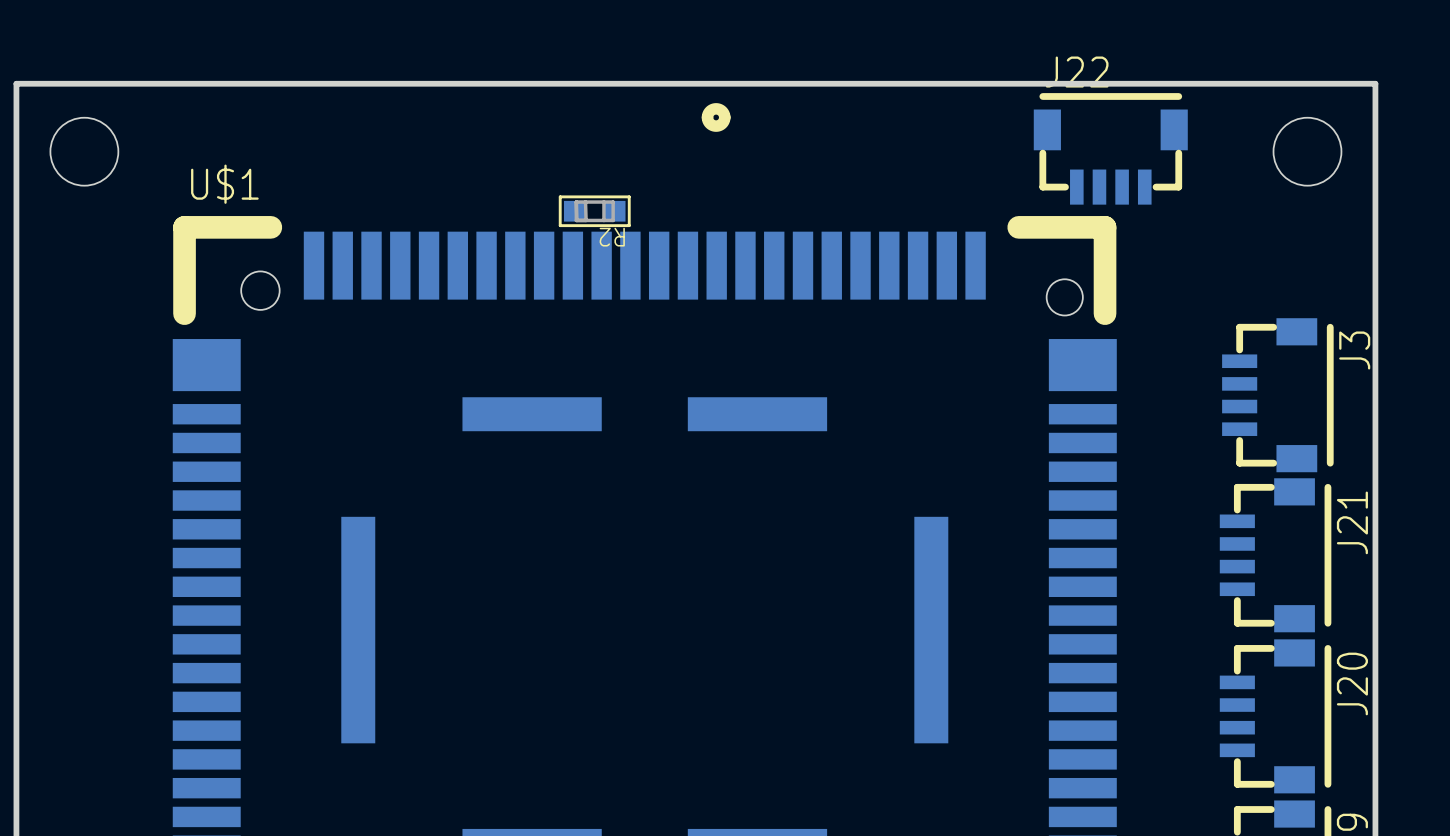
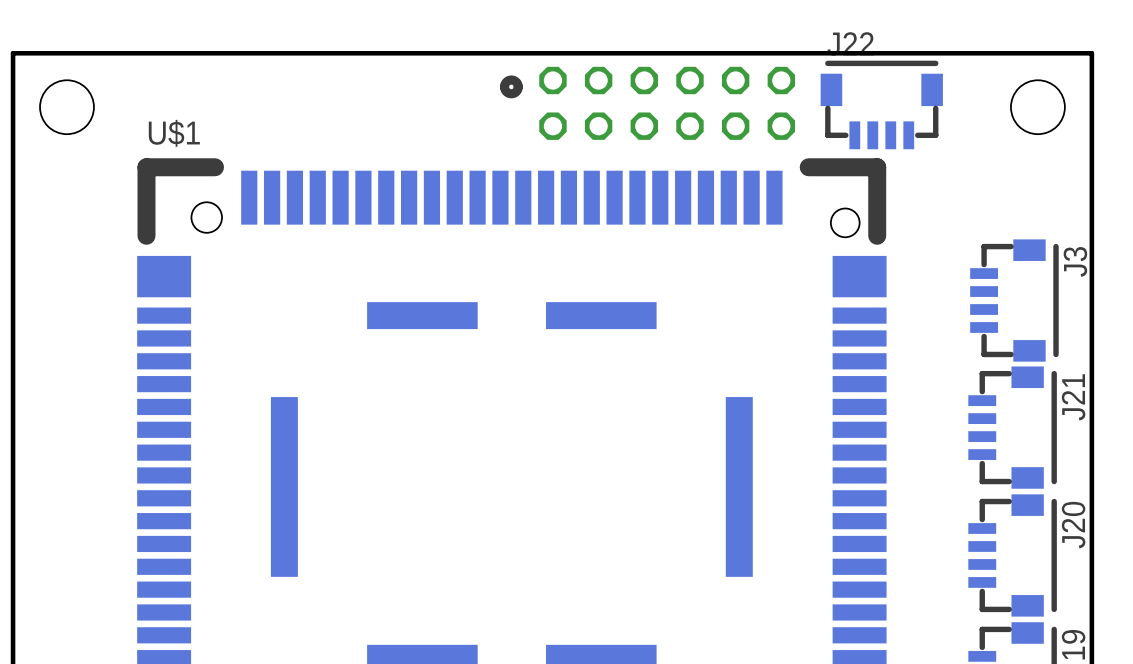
part position: (716, 117) -> (511, 86)
part: none -> (667, 103)
R2: (594, 211) -> none

